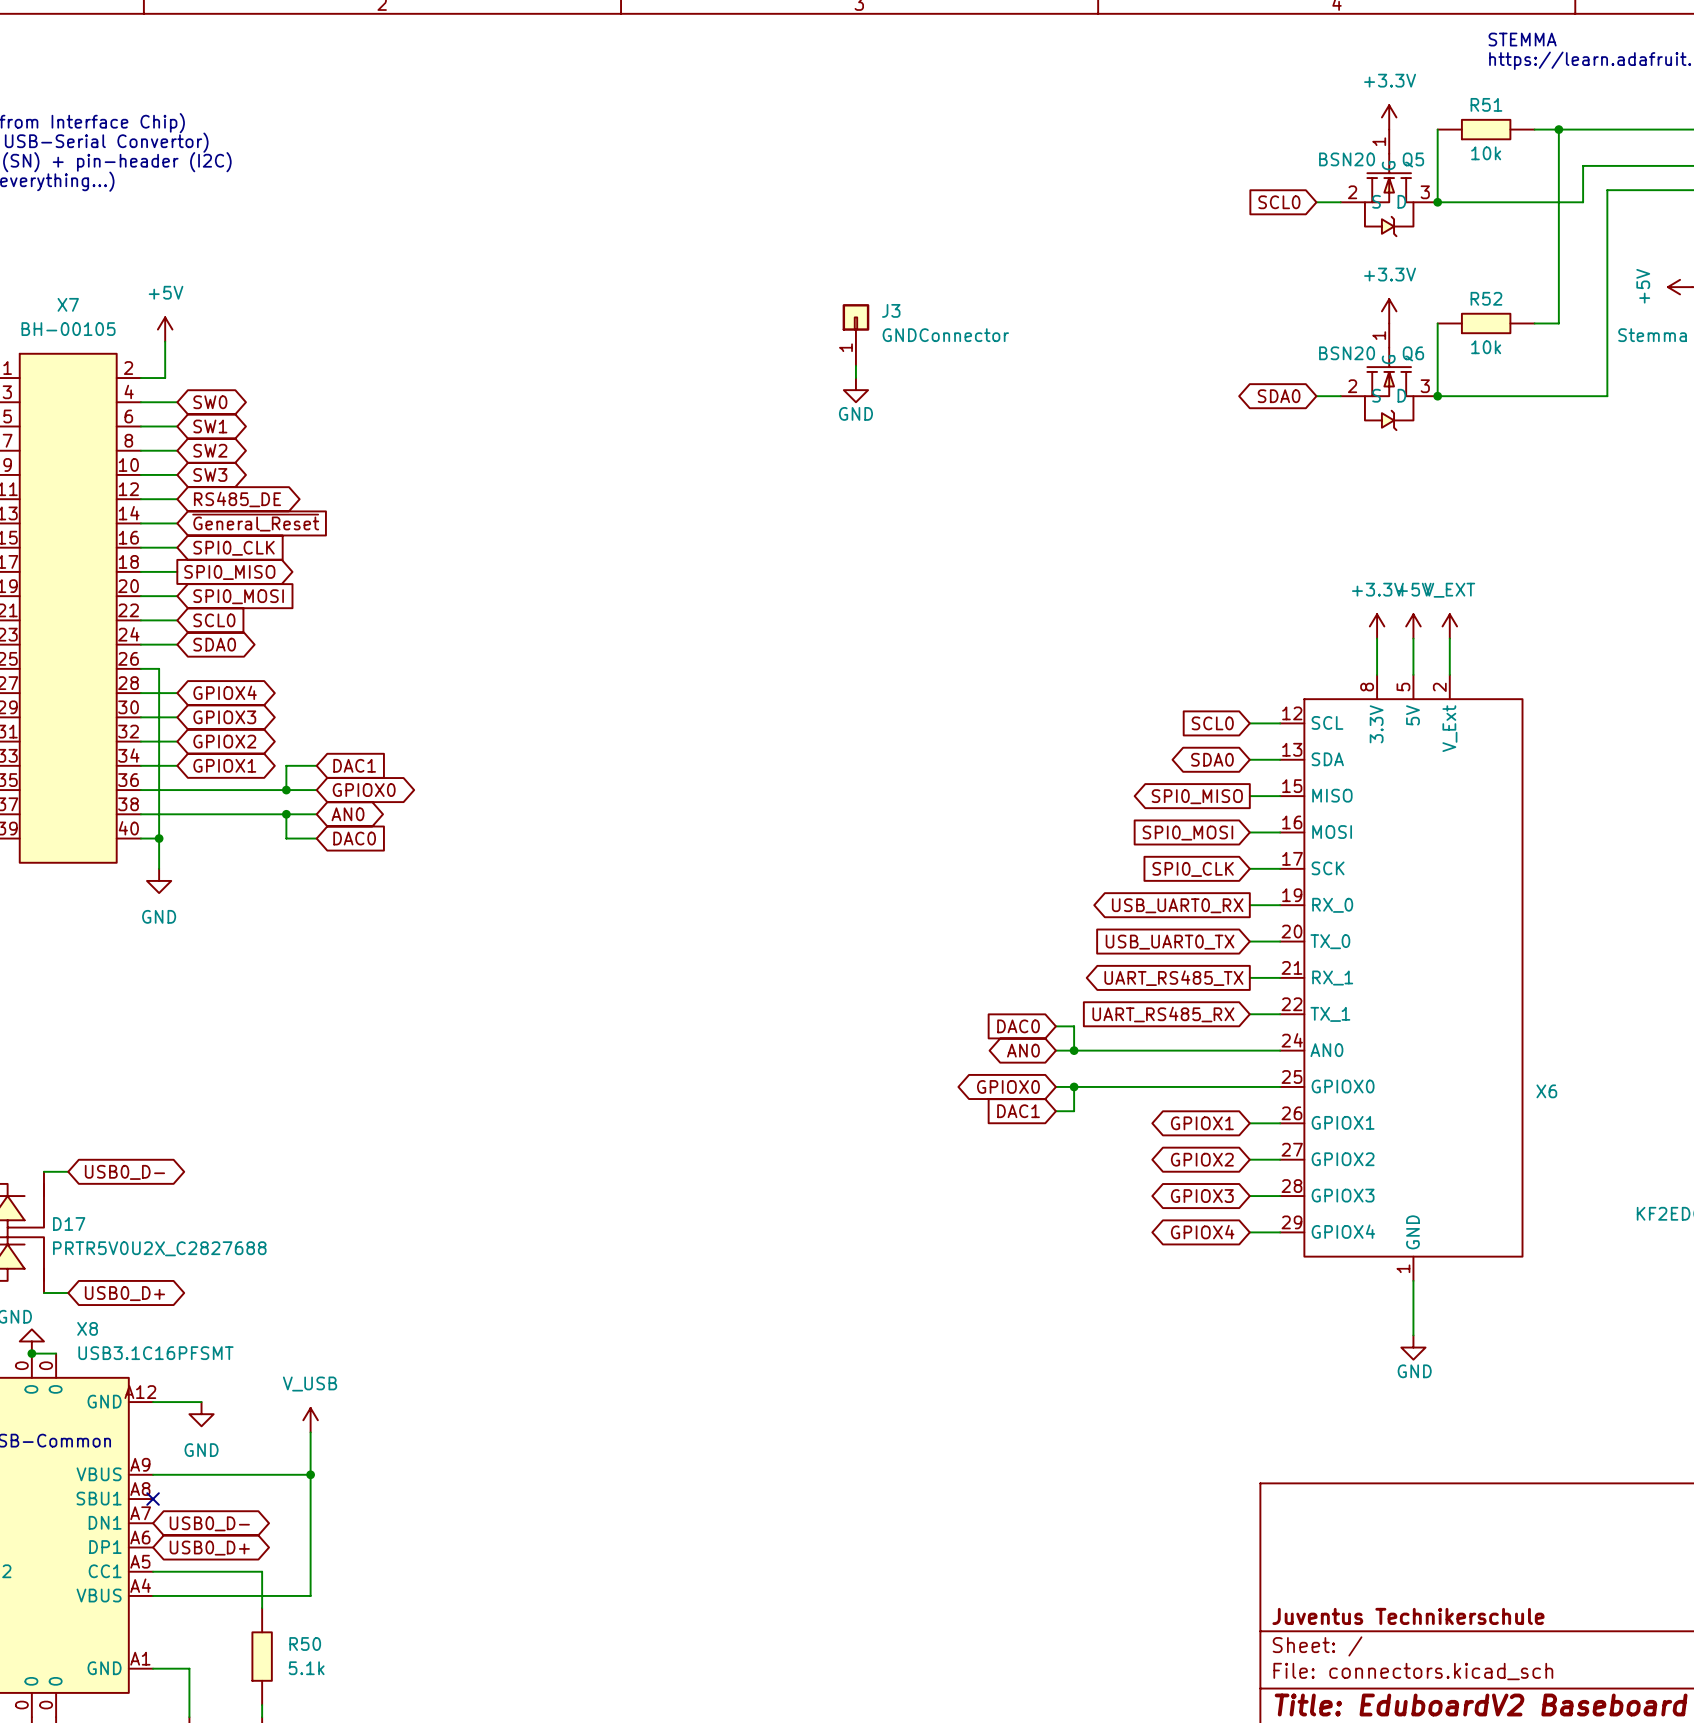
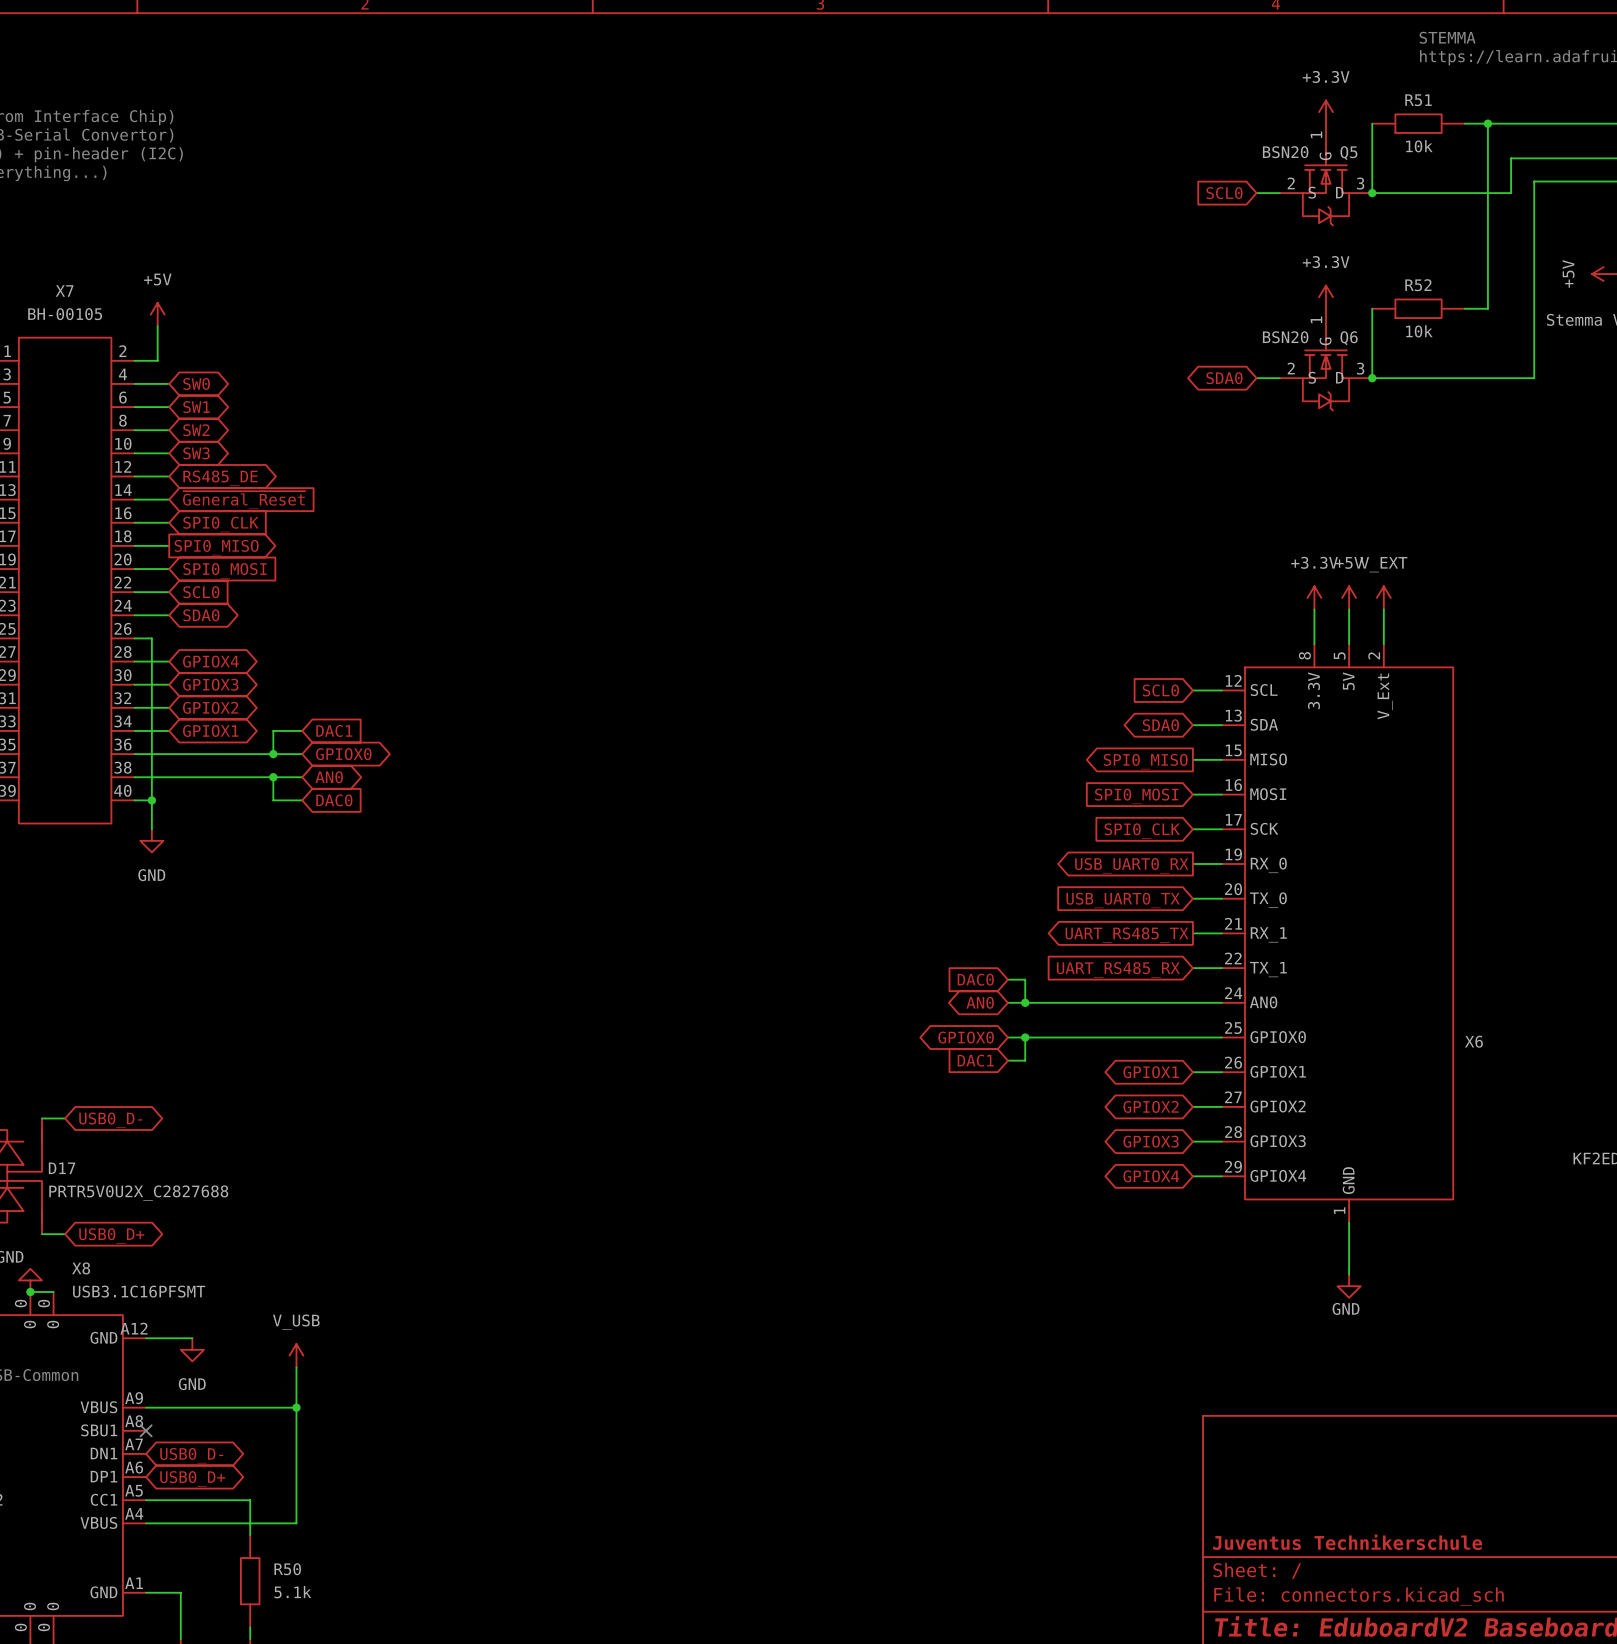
J3: GNDConnector (855, 334) -> none
wire: (855, 365) (855, 378) -> none
power symbol: GND (855, 390) -> none

